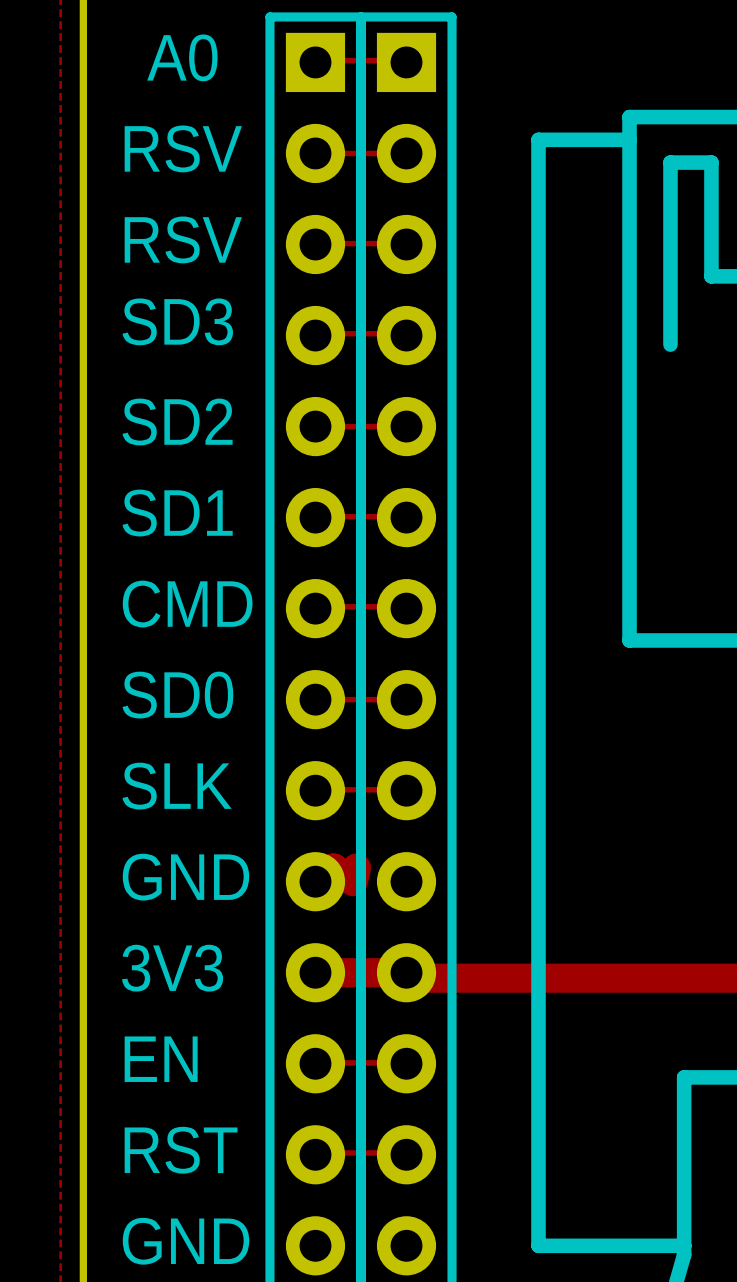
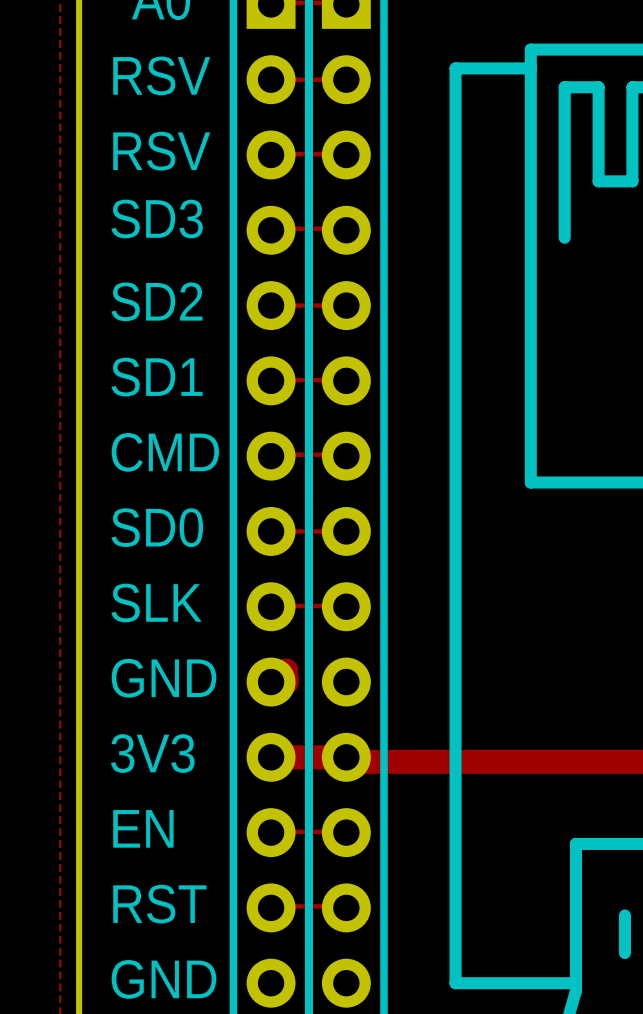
top track: (356, 868) (353, 881) -> none

